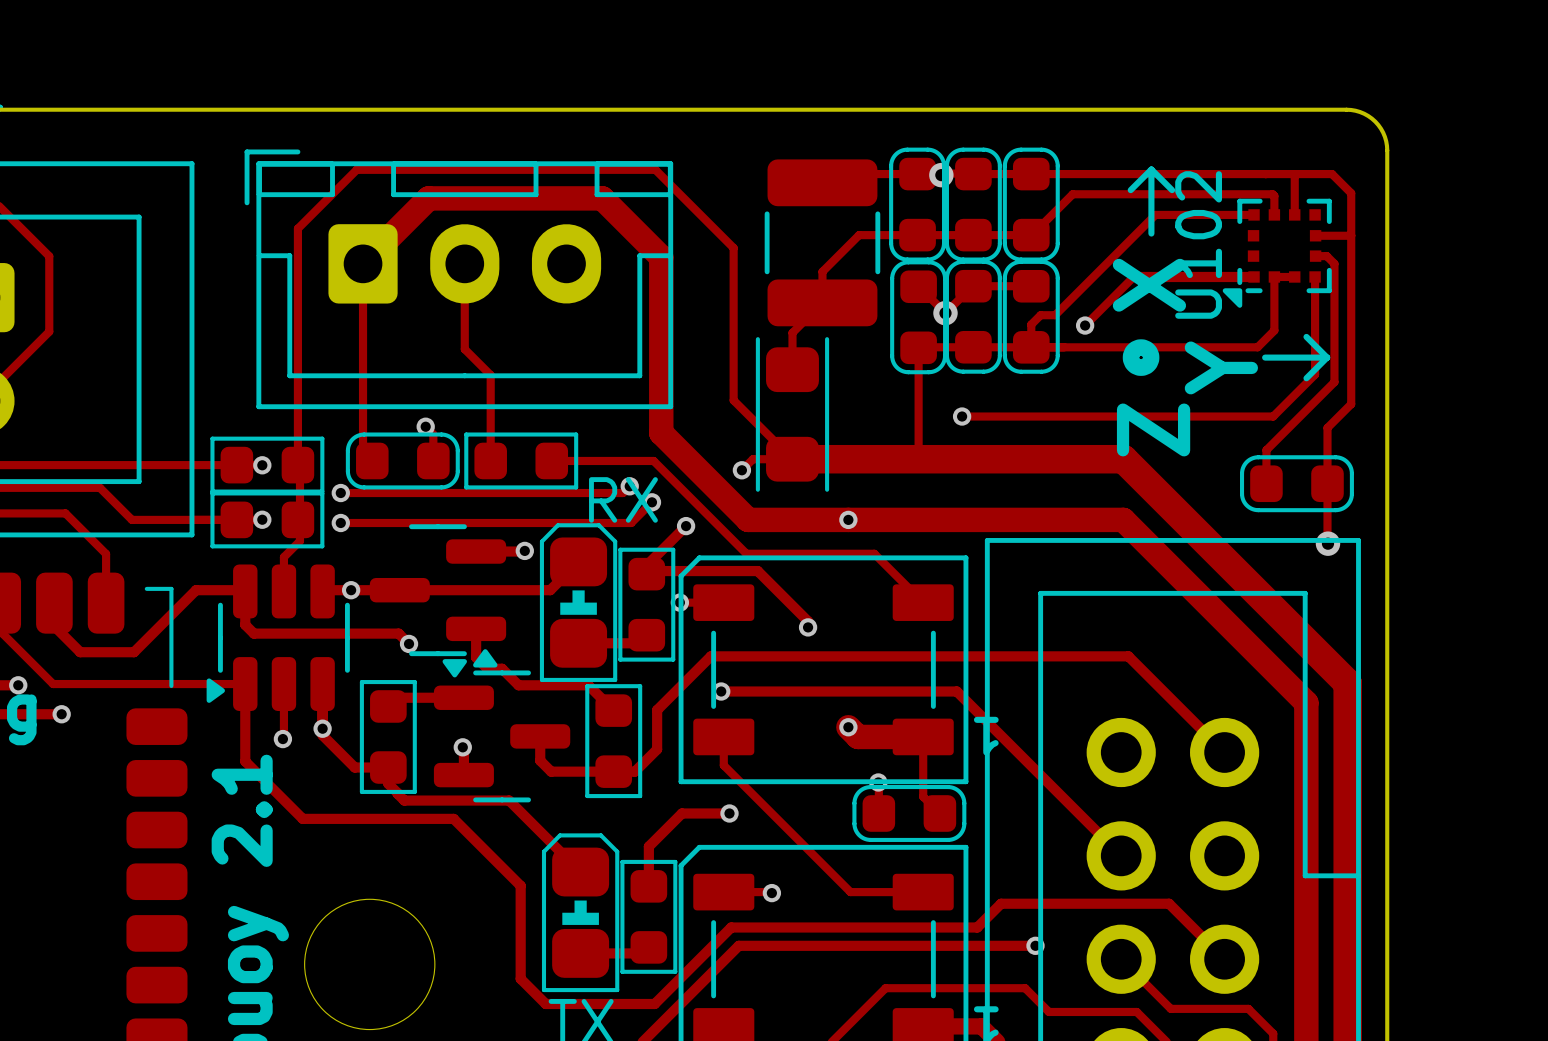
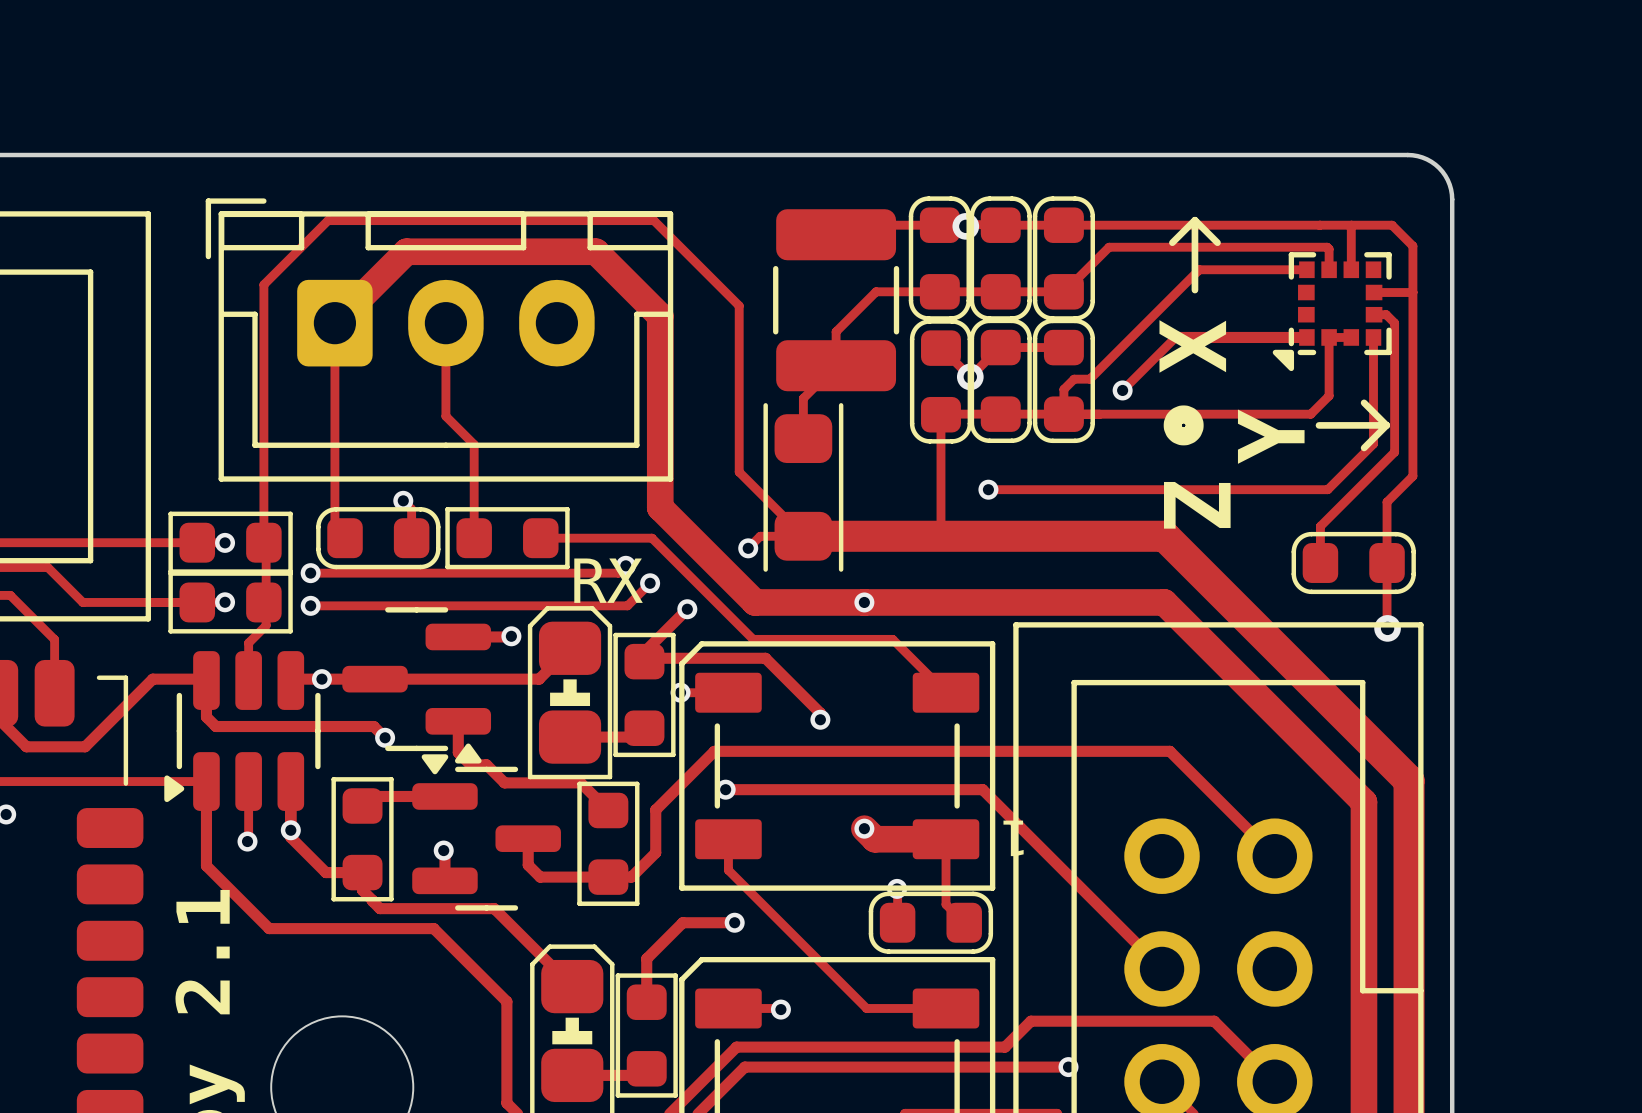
U102: (1277, 253) -> none
part: none -> (1332, 311)

